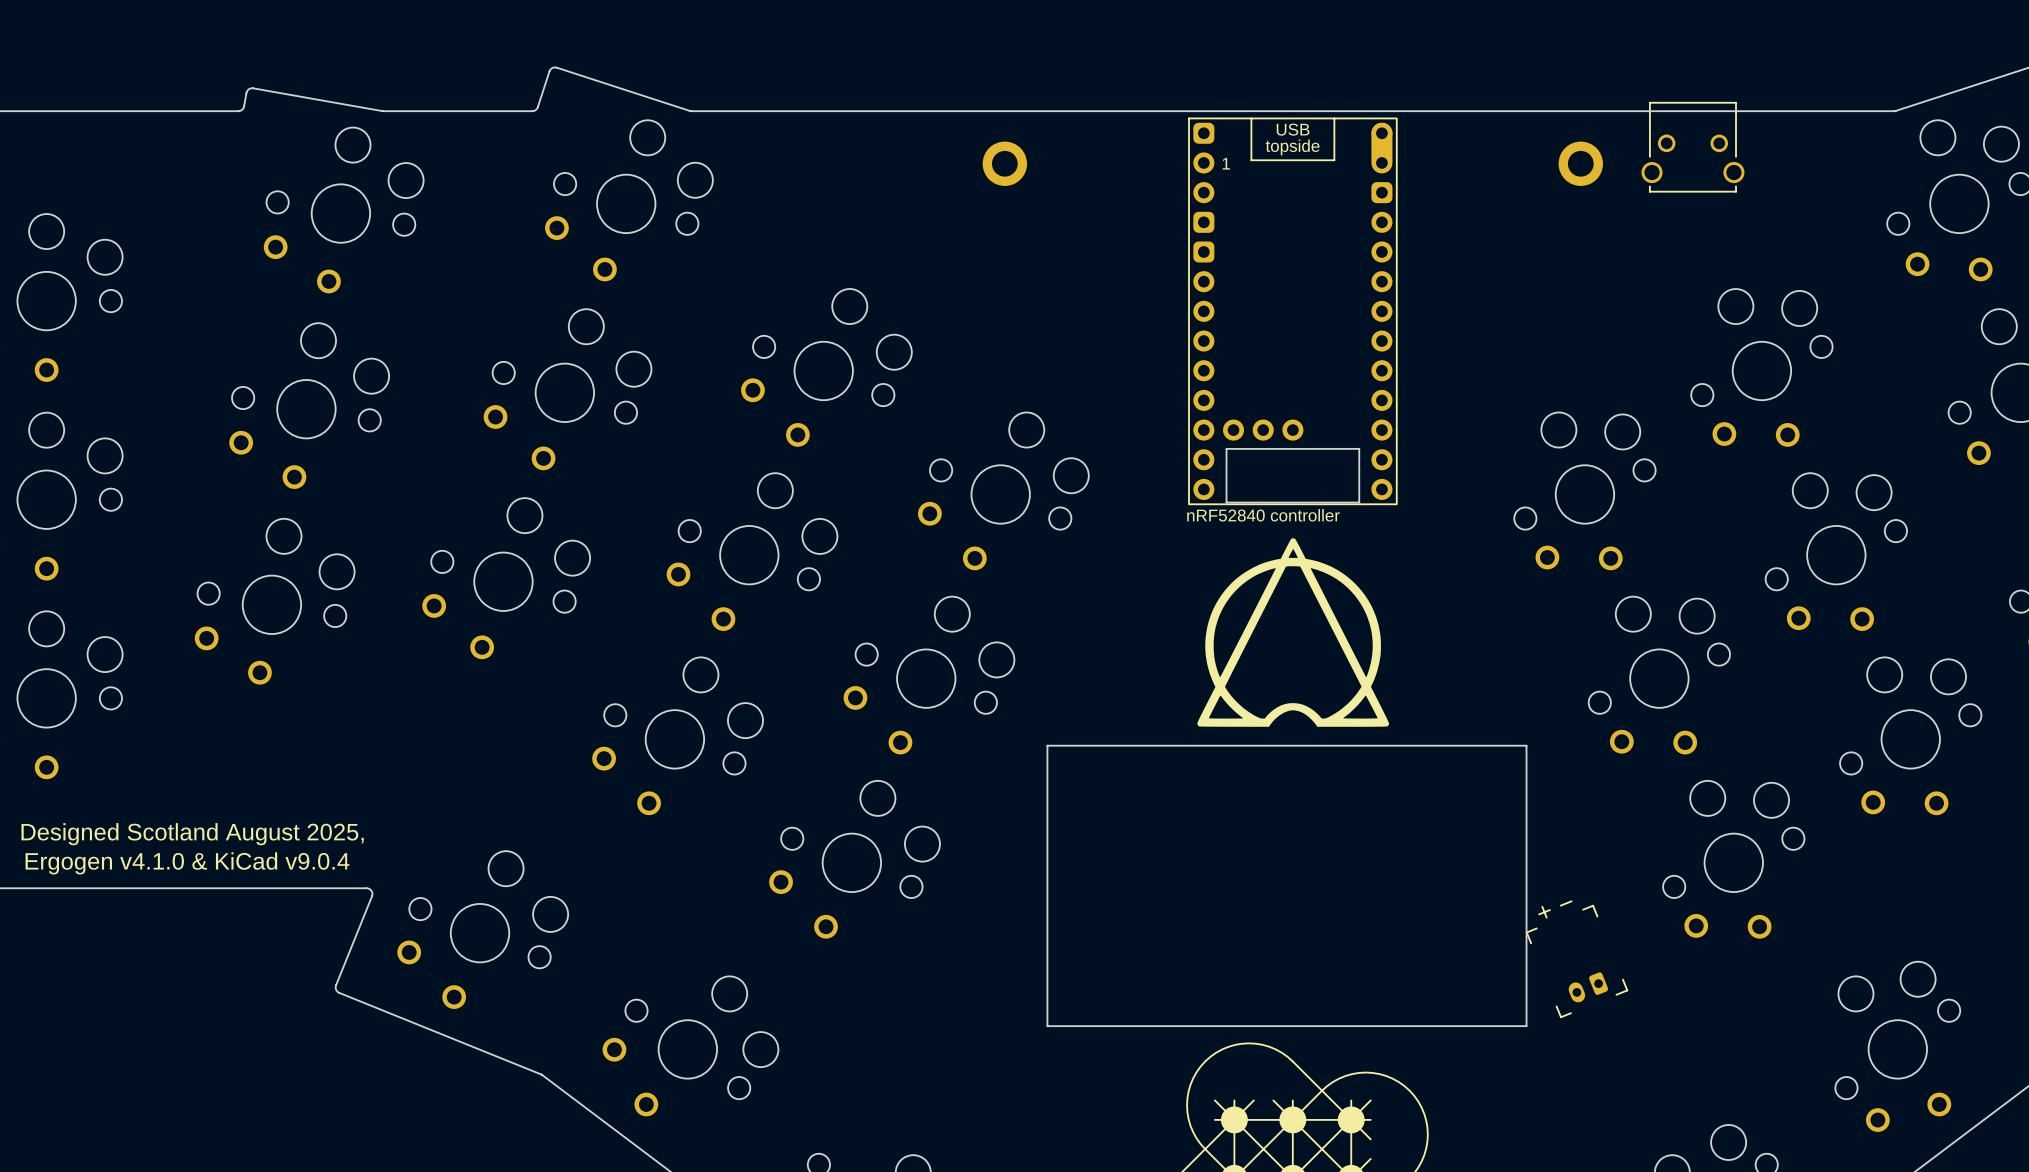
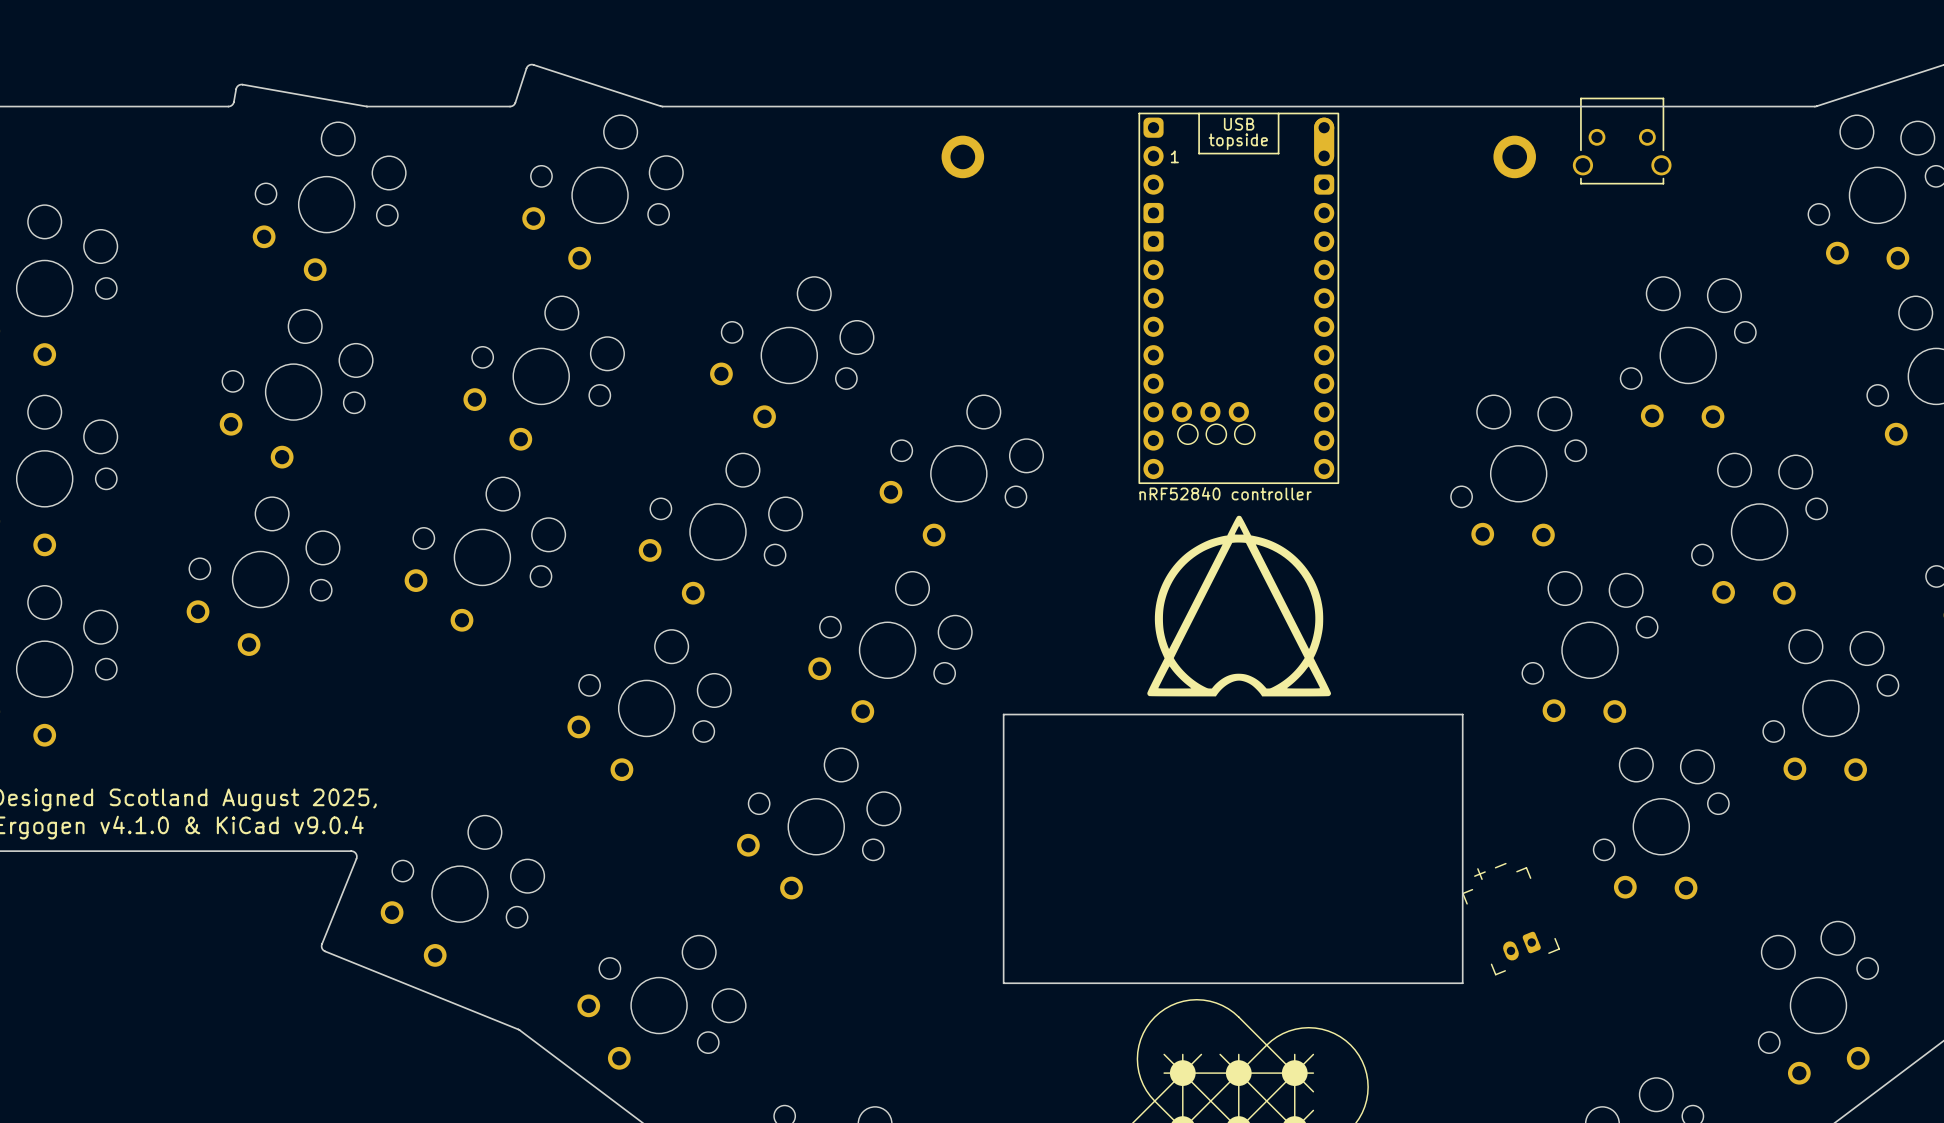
drawing: none -> [1177, 423, 1256, 445]
board edge: (1226, 448) (1359, 448) (1359, 502) (1226, 502) (1226, 448) -> none

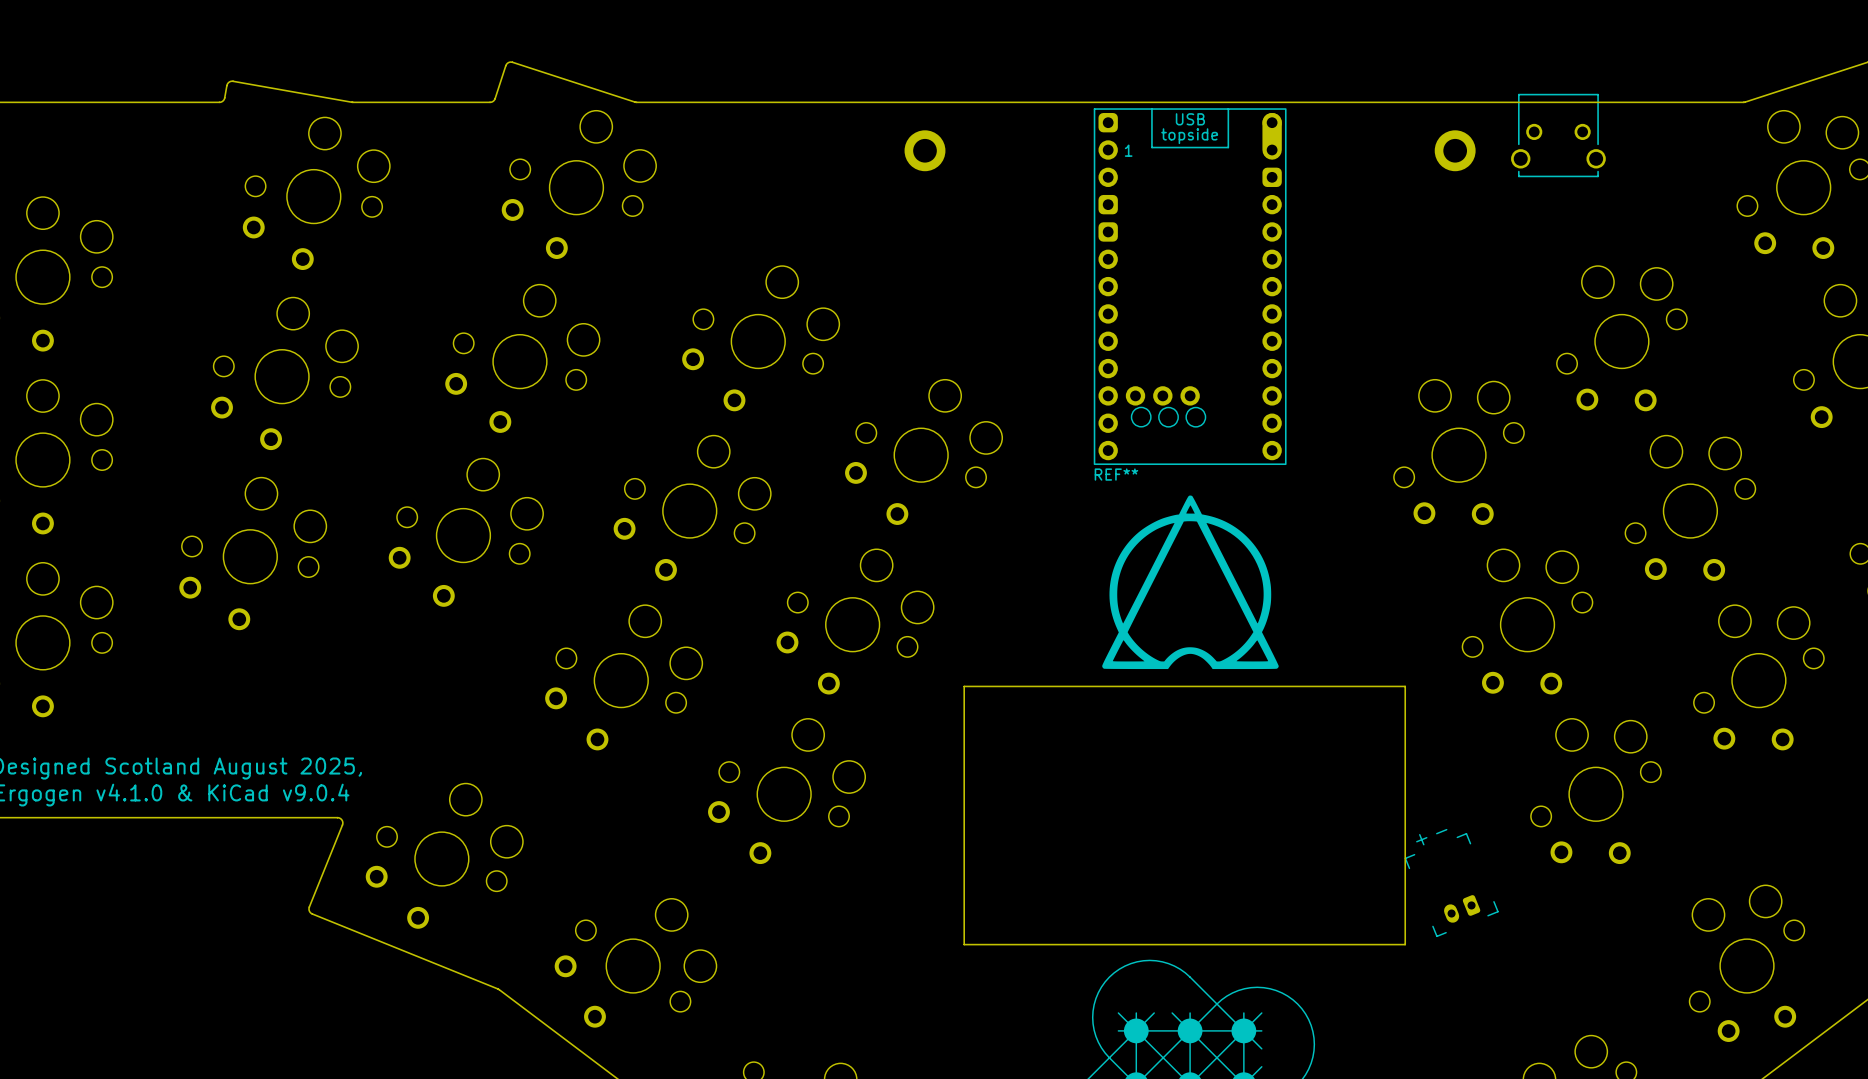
nRF52840 controller name: nRF52840 controller (1225, 493) -> REF** (1116, 474)

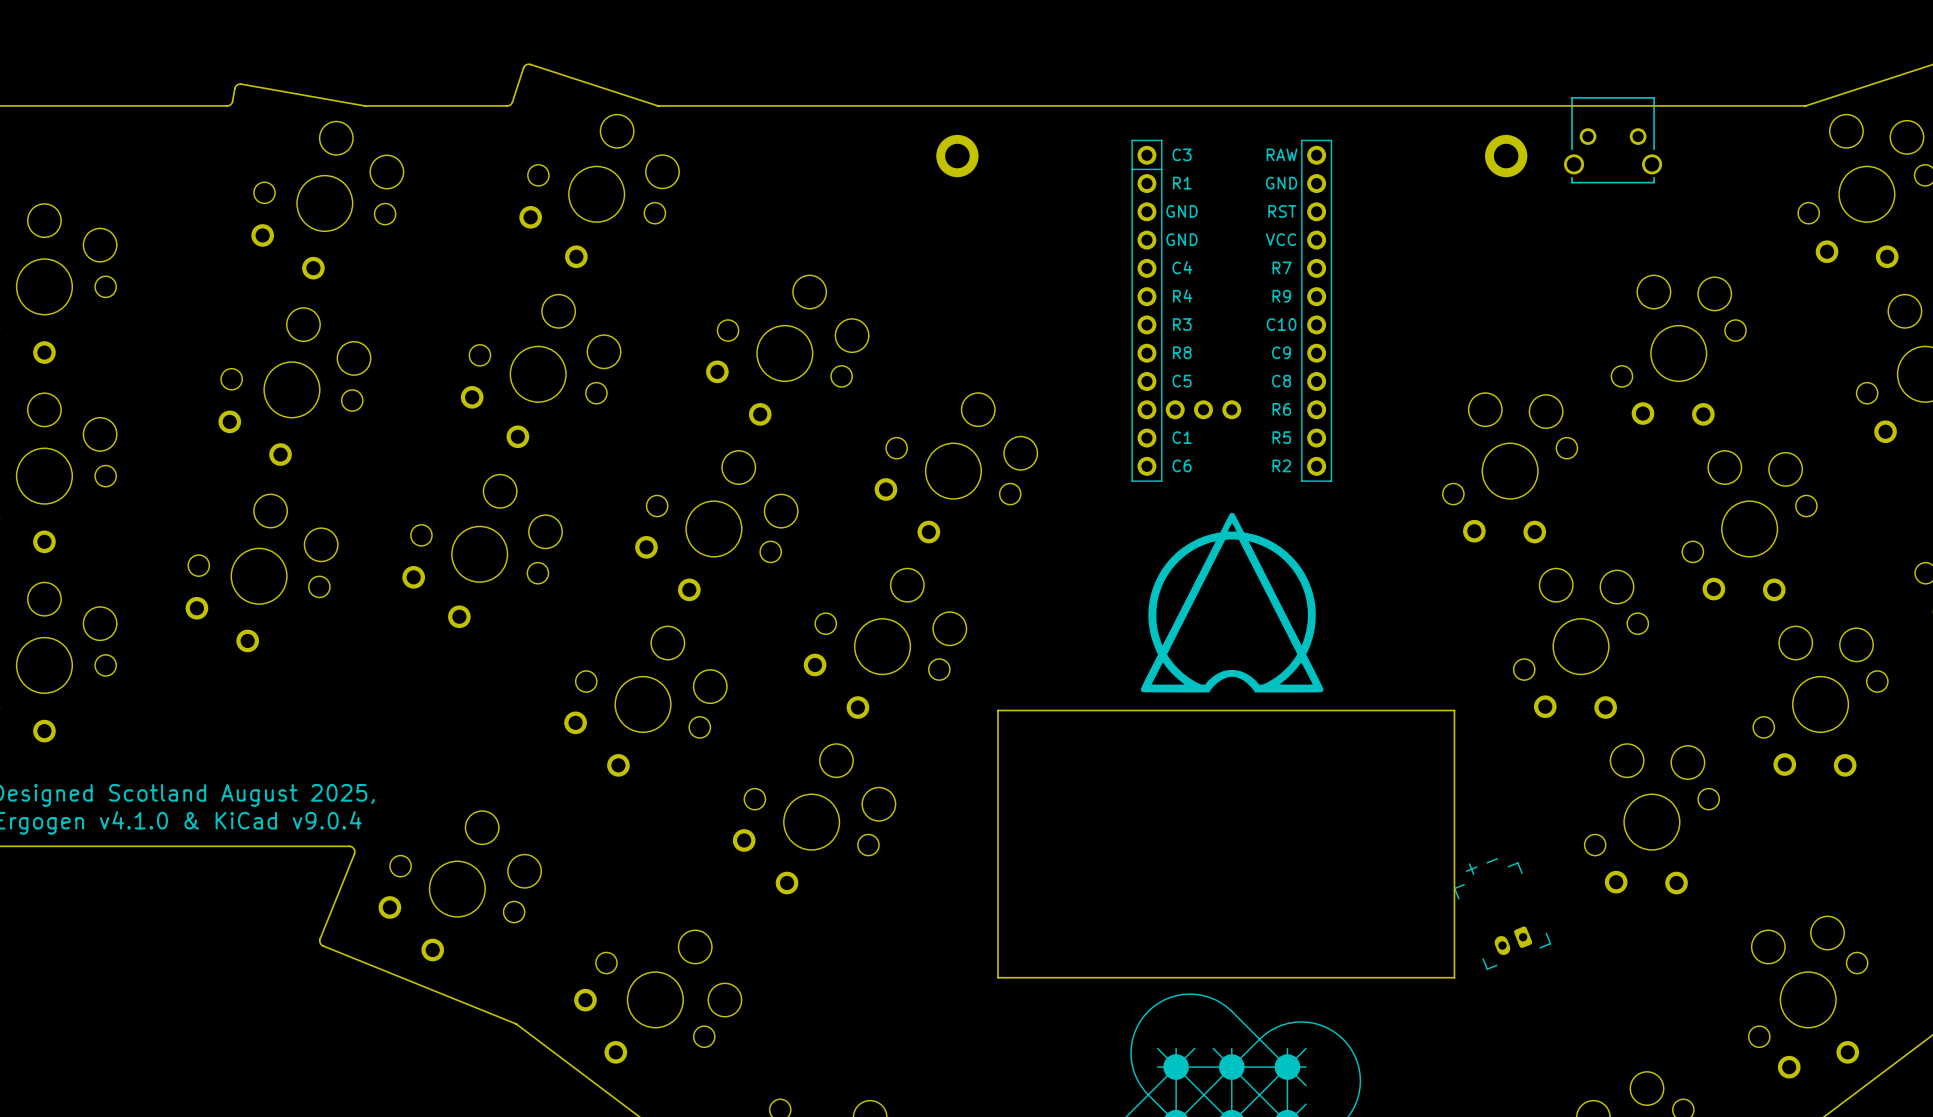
REF**: (1190, 286) -> none
part: none -> (1231, 310)
drawing: [1130, 406, 1207, 428] -> none

